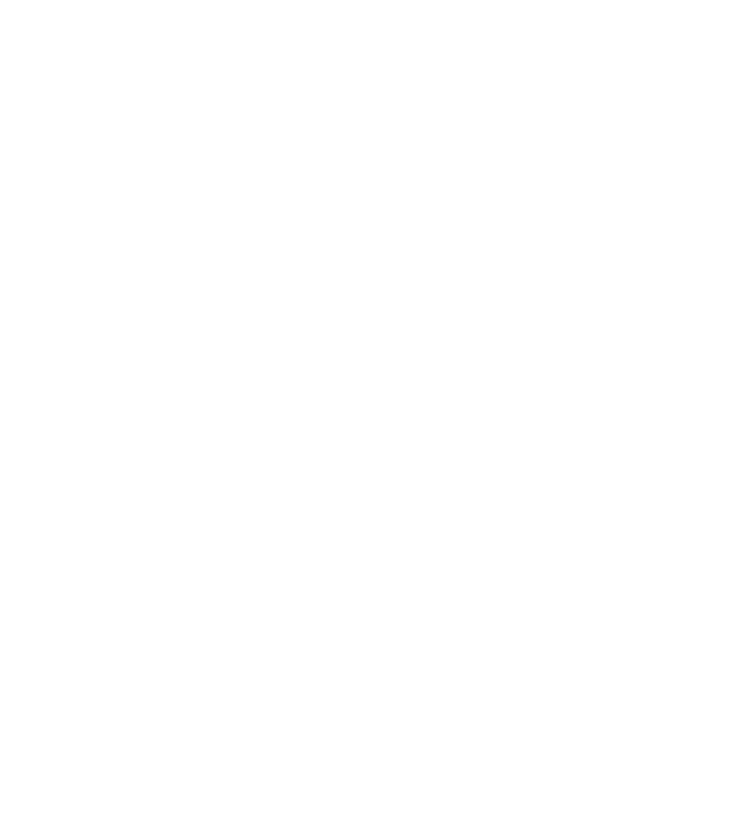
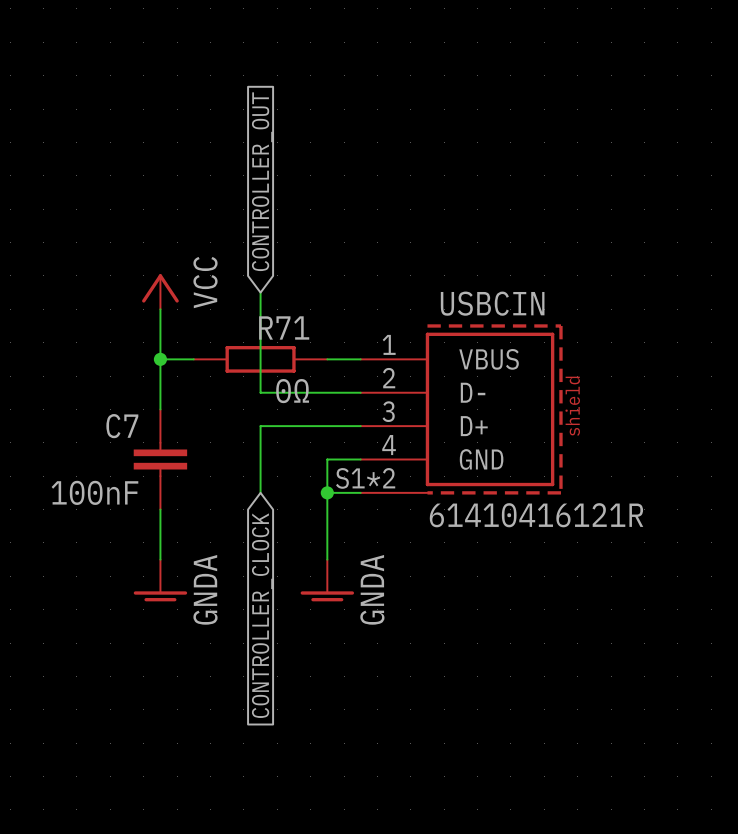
global label: none -> CONTROLLER_OUT (262, 181)
power symbol: none -> VCC (160, 291)
wire: none -> (260, 292) (260, 392) (360, 392)
wire: none -> (160, 309) (160, 409)
wire: none -> (160, 359) (193, 359)
junction: none -> (160, 359)
R71: none -> 0Ω (260, 359)
wire: none -> (327, 359) (360, 359)
USBCIN: none -> 61410416121R (461, 409)
wire: none -> (360, 426) (260, 426) (260, 492)
C7: none -> 100nF (160, 459)
wire: none -> (360, 459) (327, 459) (327, 559)
wire: none -> (327, 492) (360, 492)
junction: none -> (327, 492)
wire: none -> (160, 509) (160, 559)
power symbol: none -> GNDA (160, 580)
power symbol: none -> GNDA (327, 580)
global label: none -> CONTROLLER_CLOCK (262, 615)

